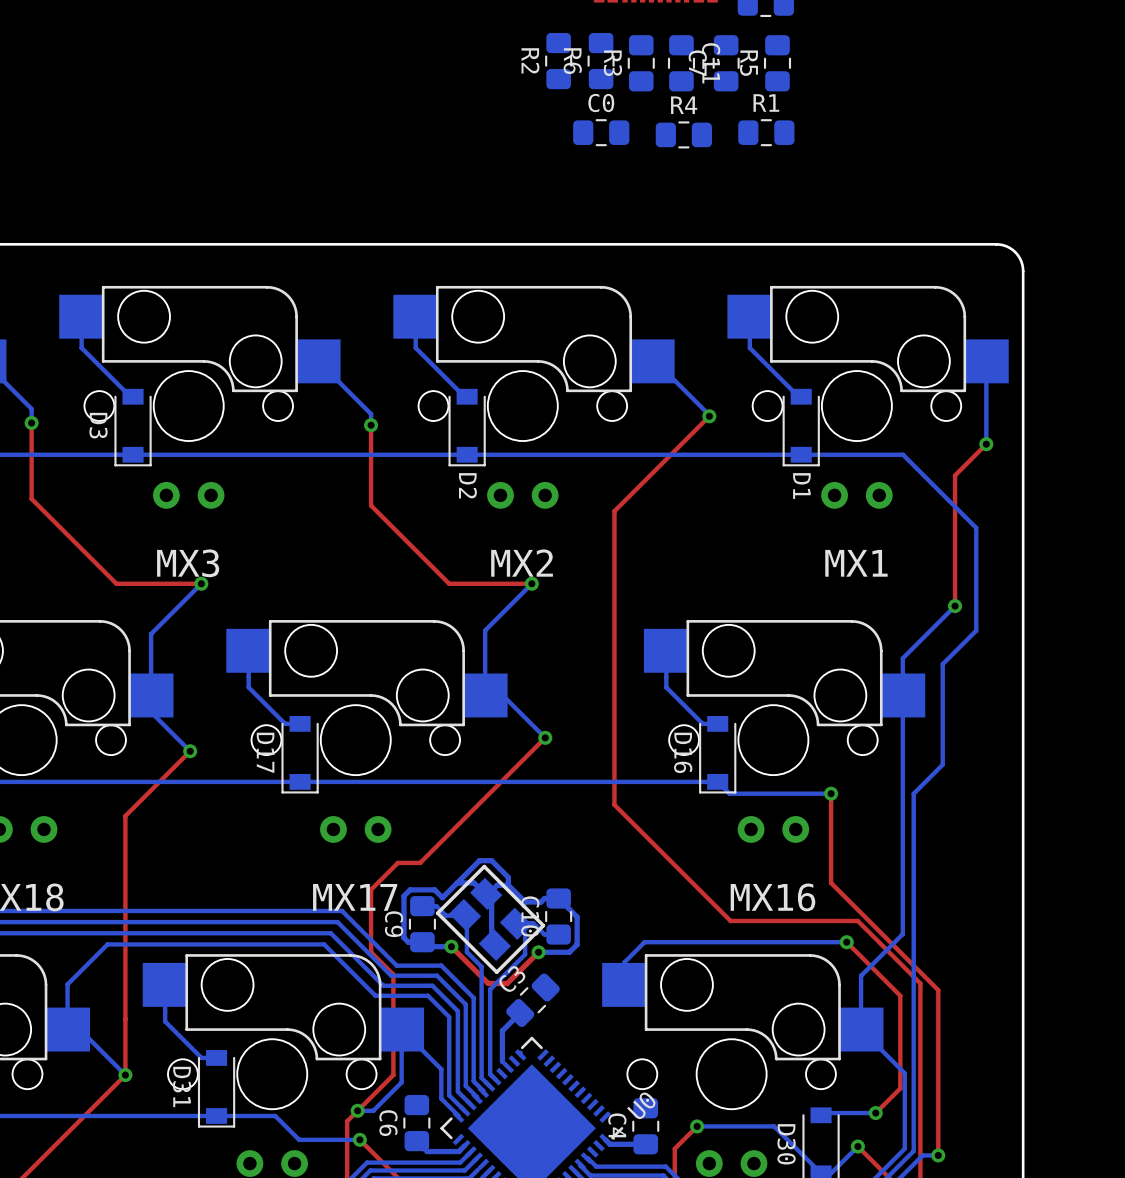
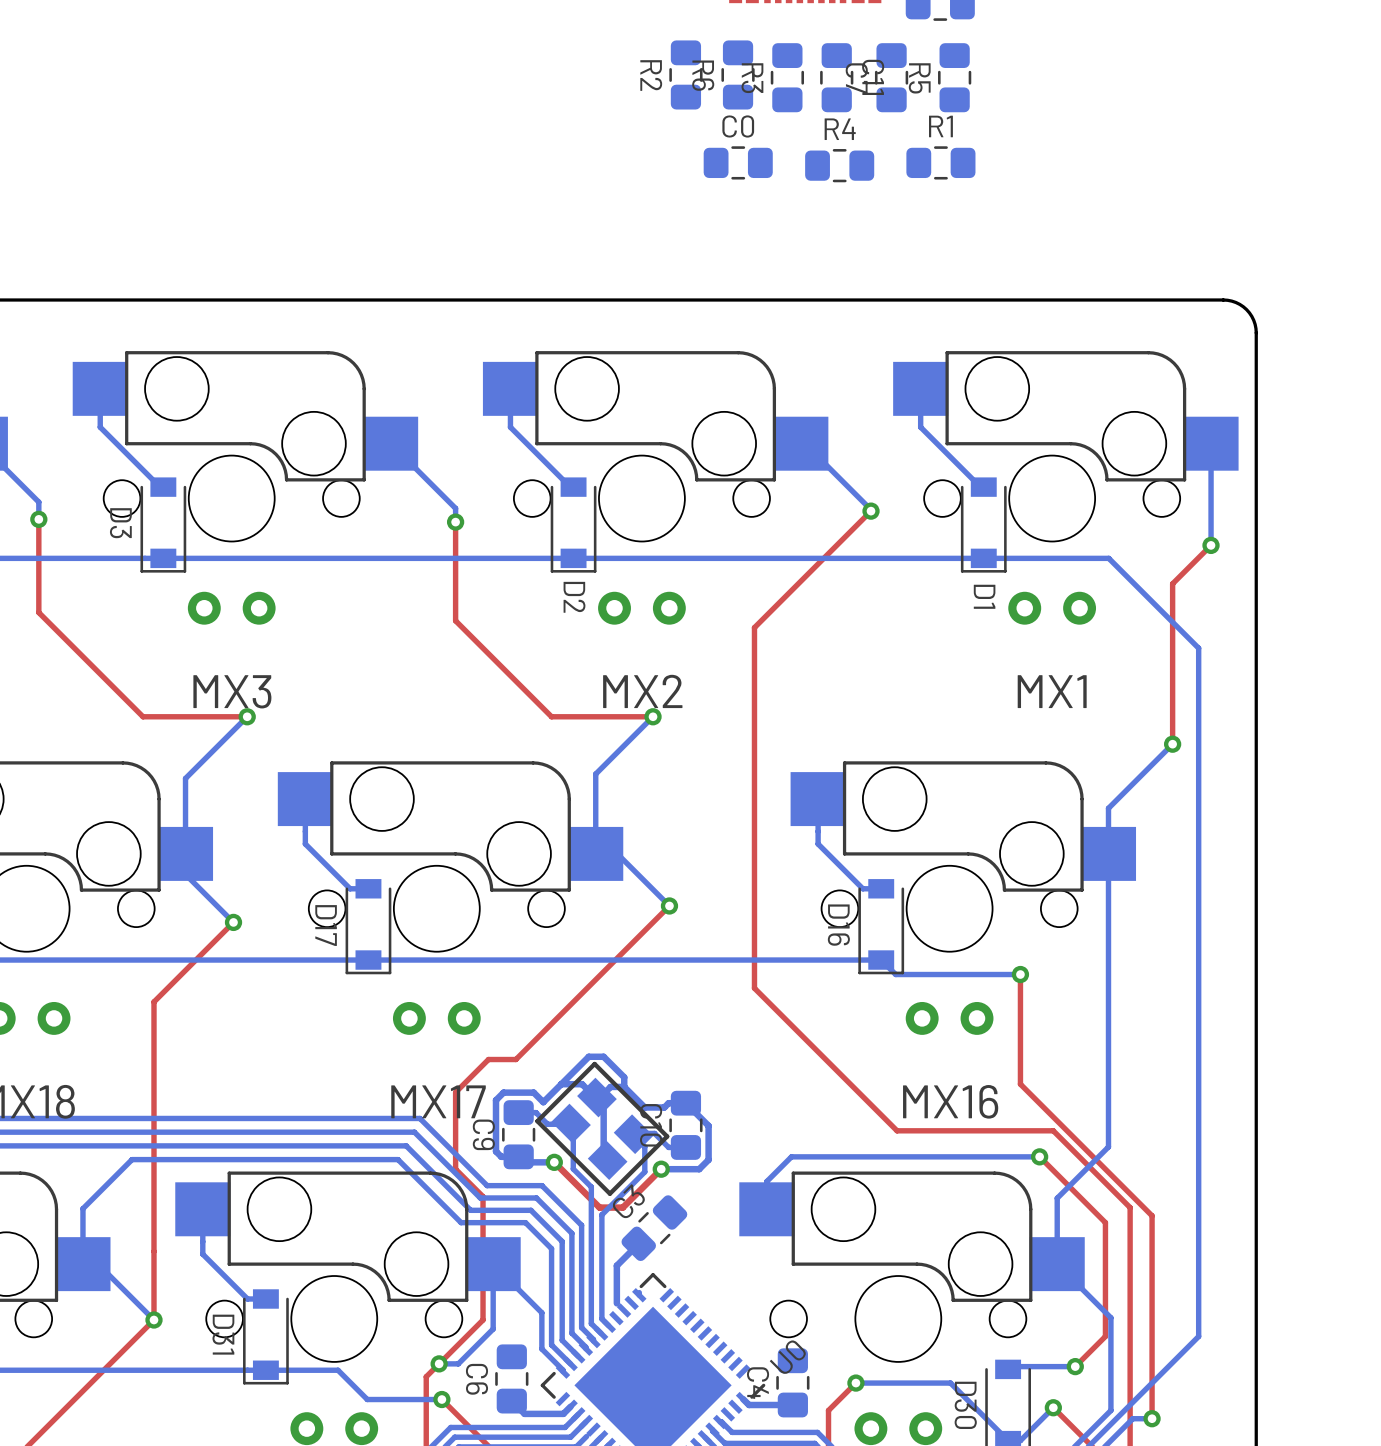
bottom track: (976, 630) (942, 664) (942, 764) (913, 793) (913, 1151) -> (1198, 774) (1198, 1336) (1121, 1413)

